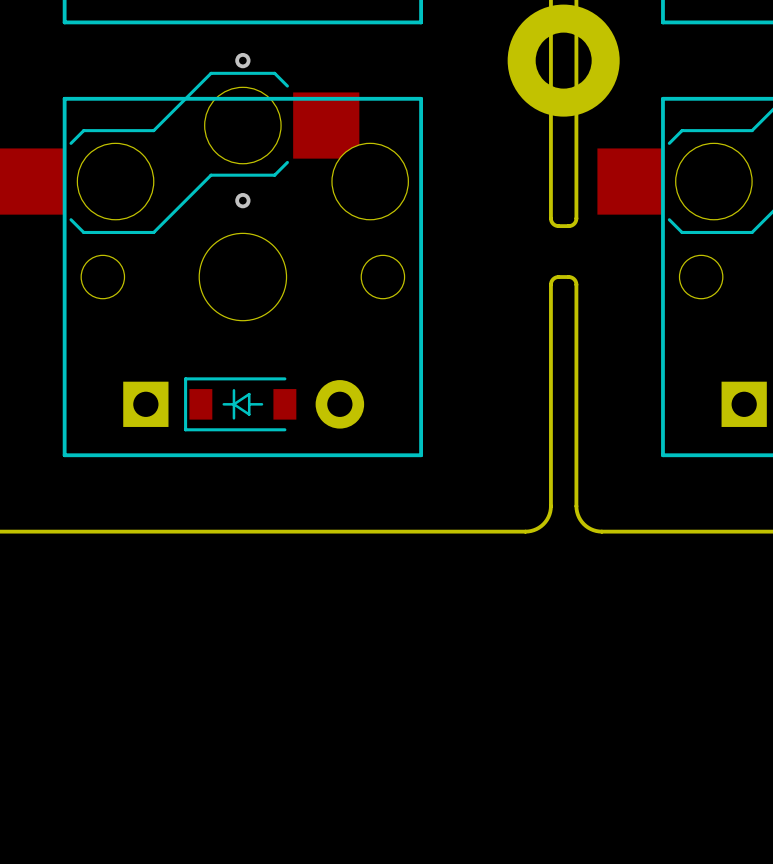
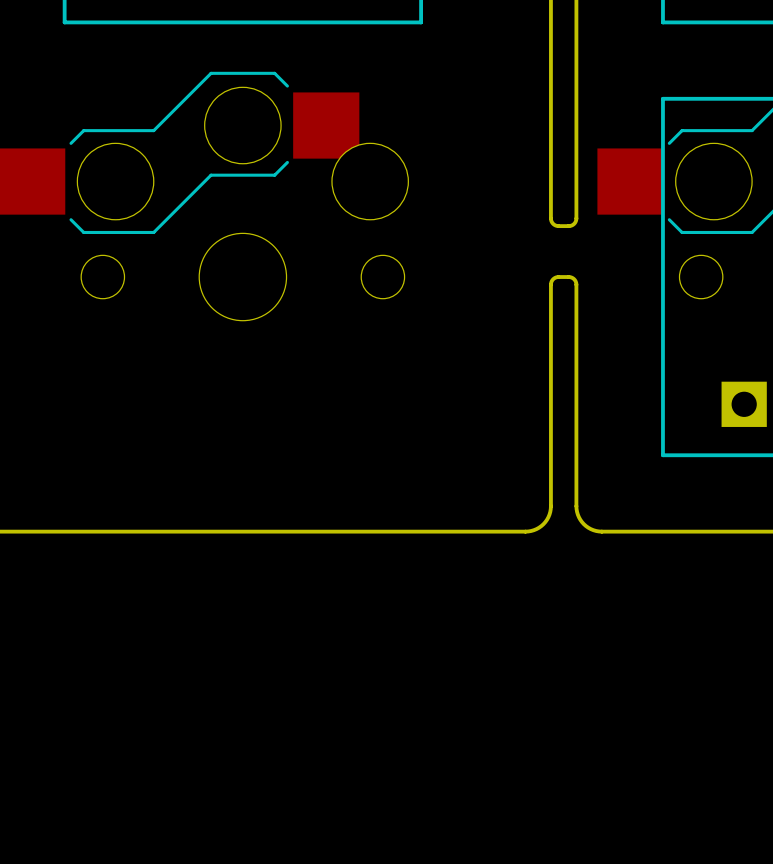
via: (242, 60) -> none
part: (563, 60) -> none
line: (64, 98) (421, 98) (421, 455) (64, 455) (64, 98) -> none
via: (242, 200) -> none
part: (243, 404) -> none

